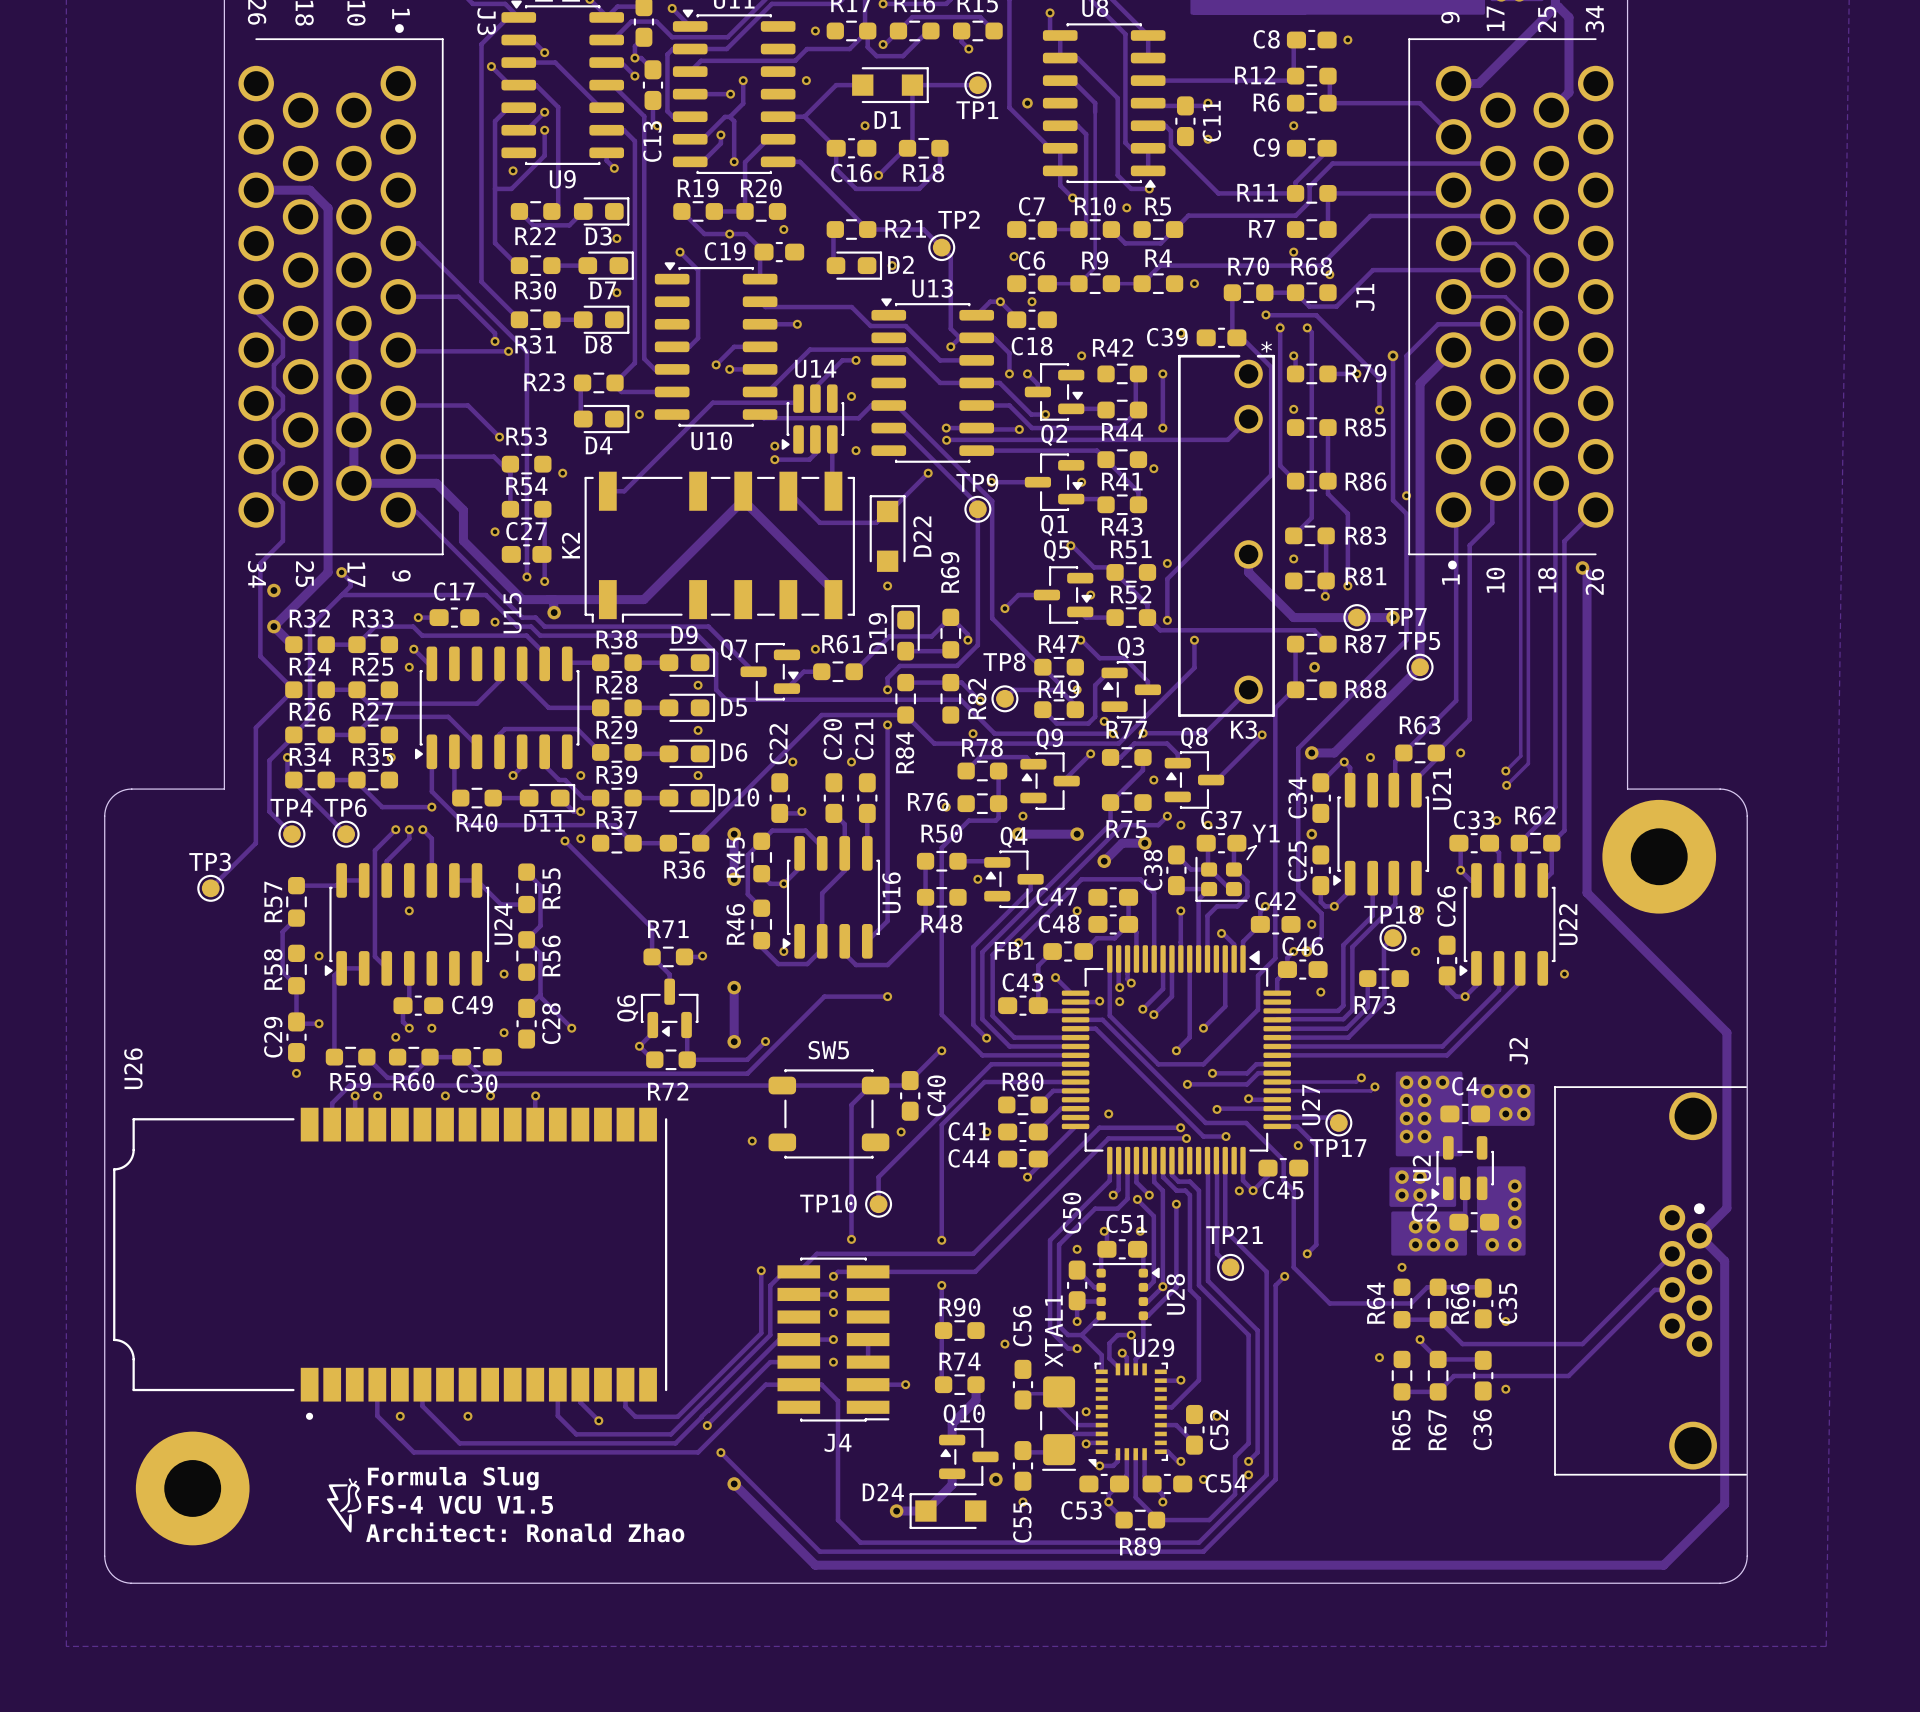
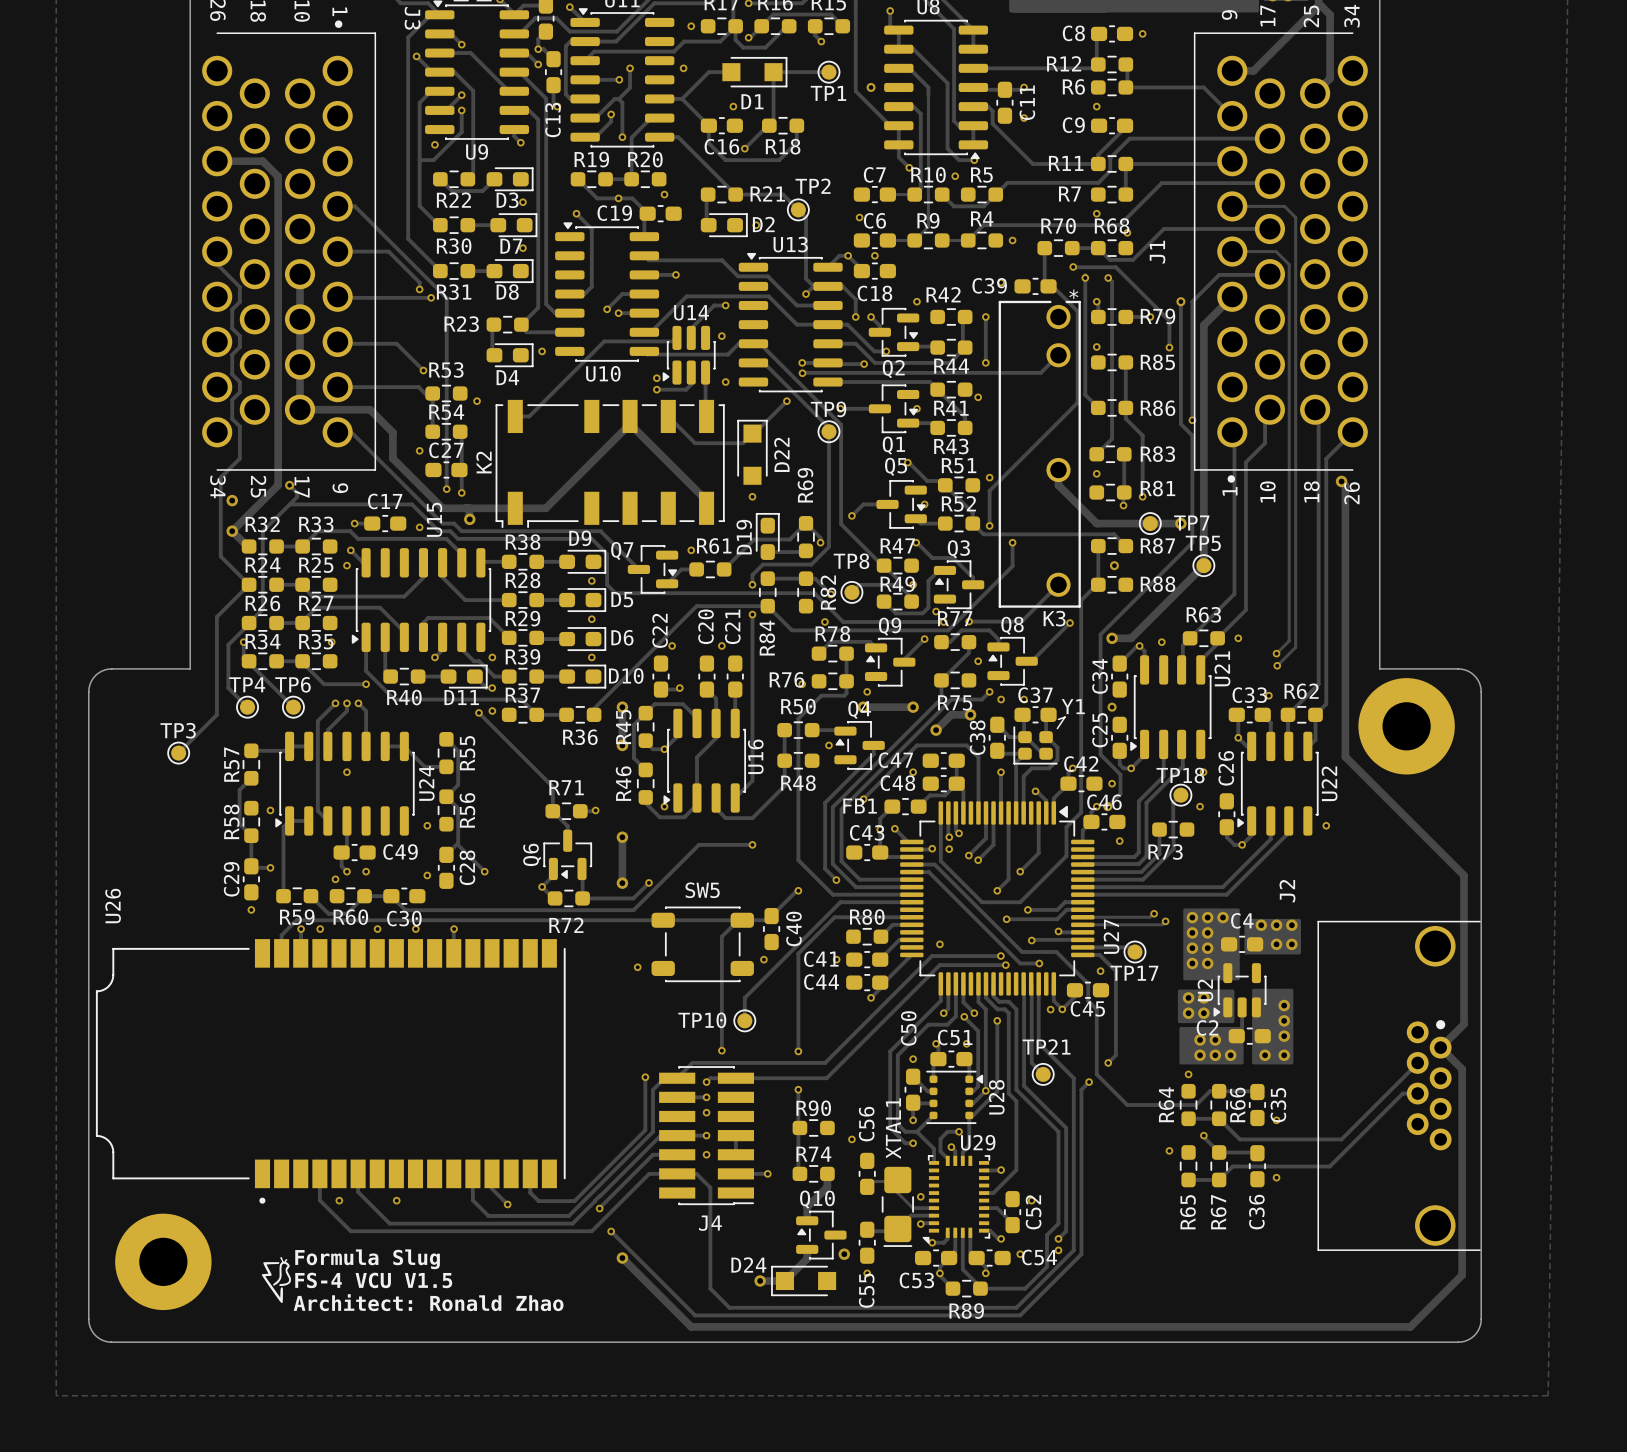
drawing: [326, 1478, 362, 1533] -> none
text: Formula Slug (453, 1478) -> none
drawing: none -> [261, 1257, 291, 1304]
text: FS-4 VCU V1.5 (460, 1504) -> none
text: Architect: Ronald Zhao (525, 1532) -> none

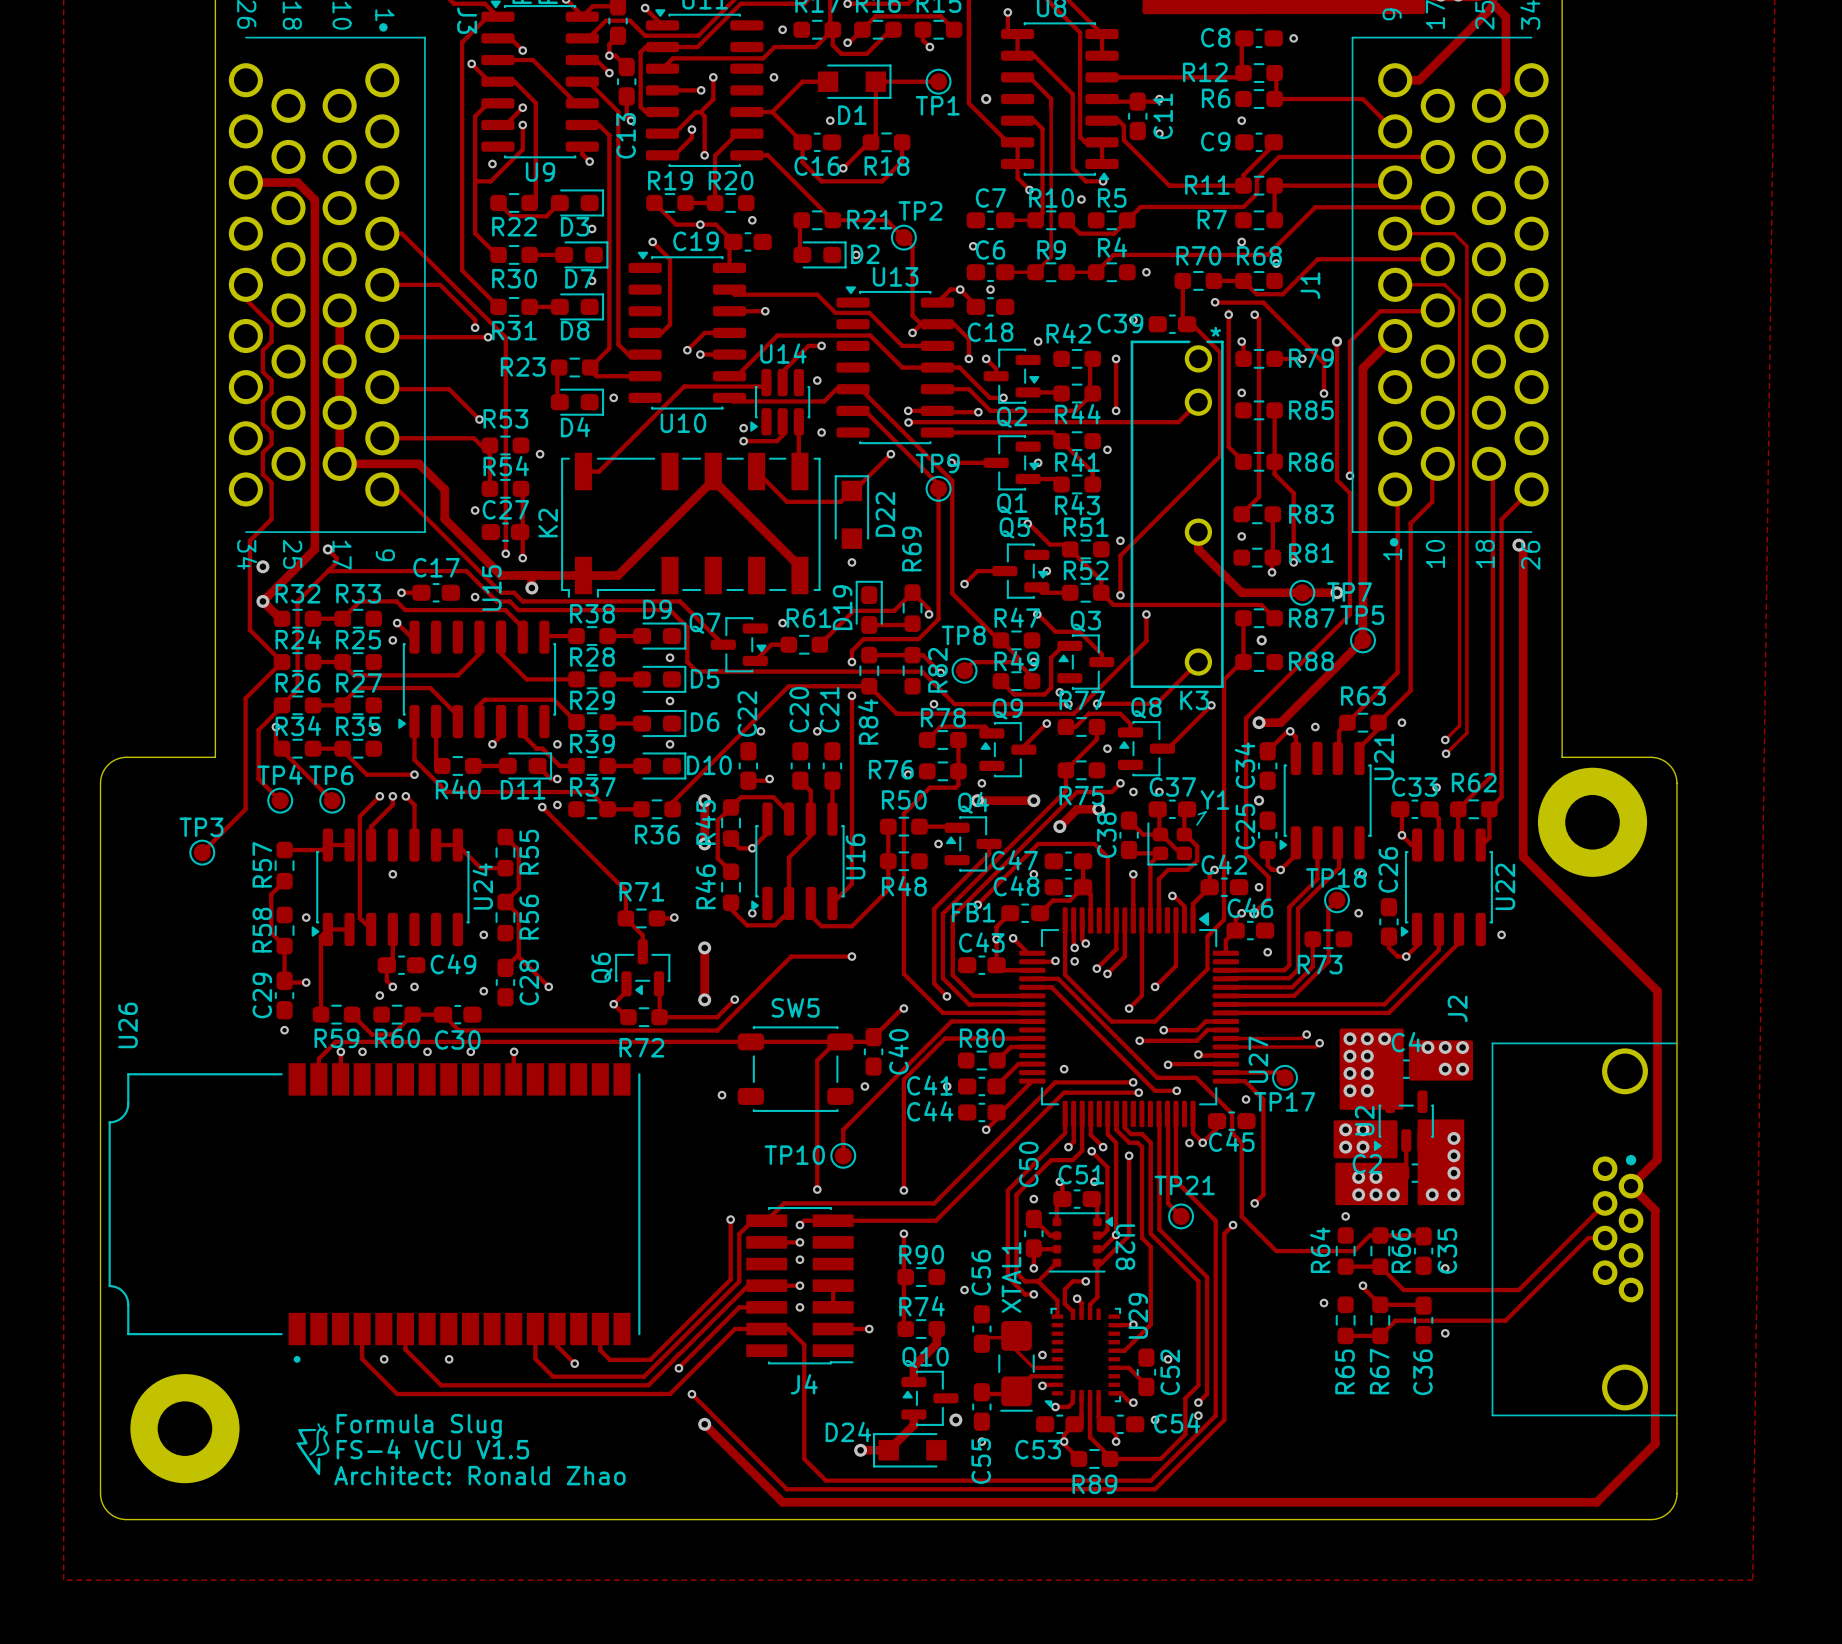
U28 name rotation: 0° (996, 1097) -> 180° (1125, 1247)
U29 name rotation: 0° (978, 1142) -> 90° counterclockwise (1138, 1315)

